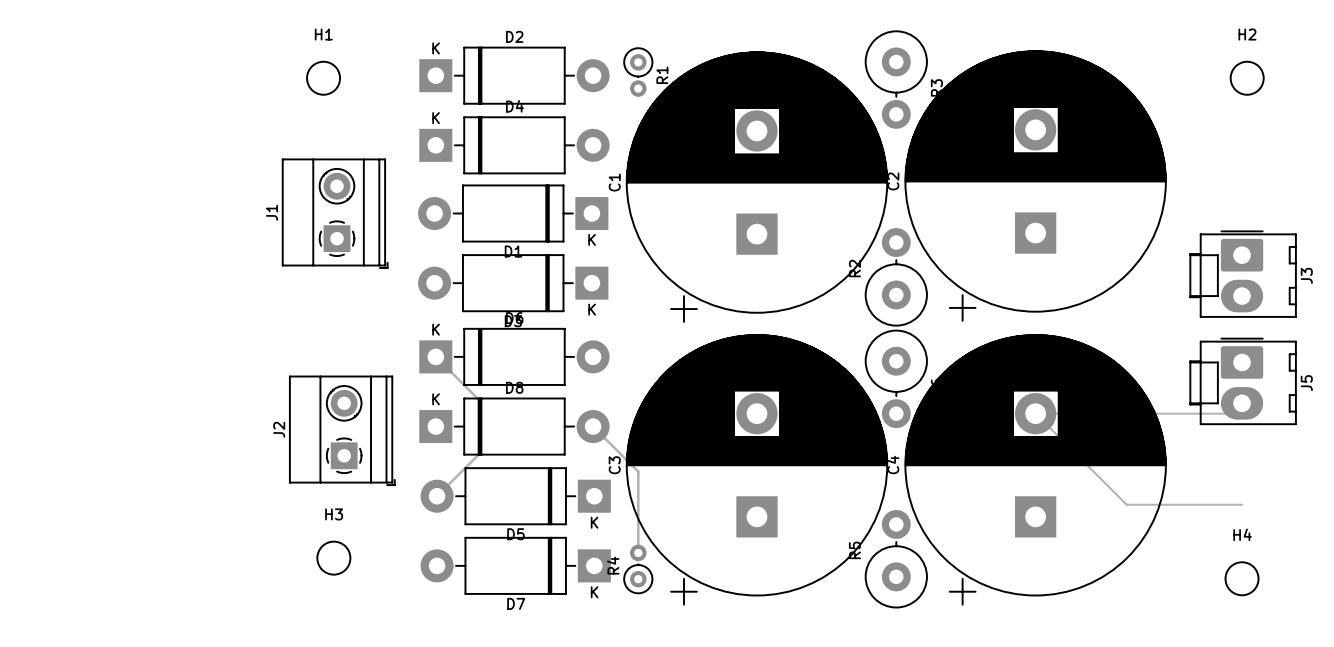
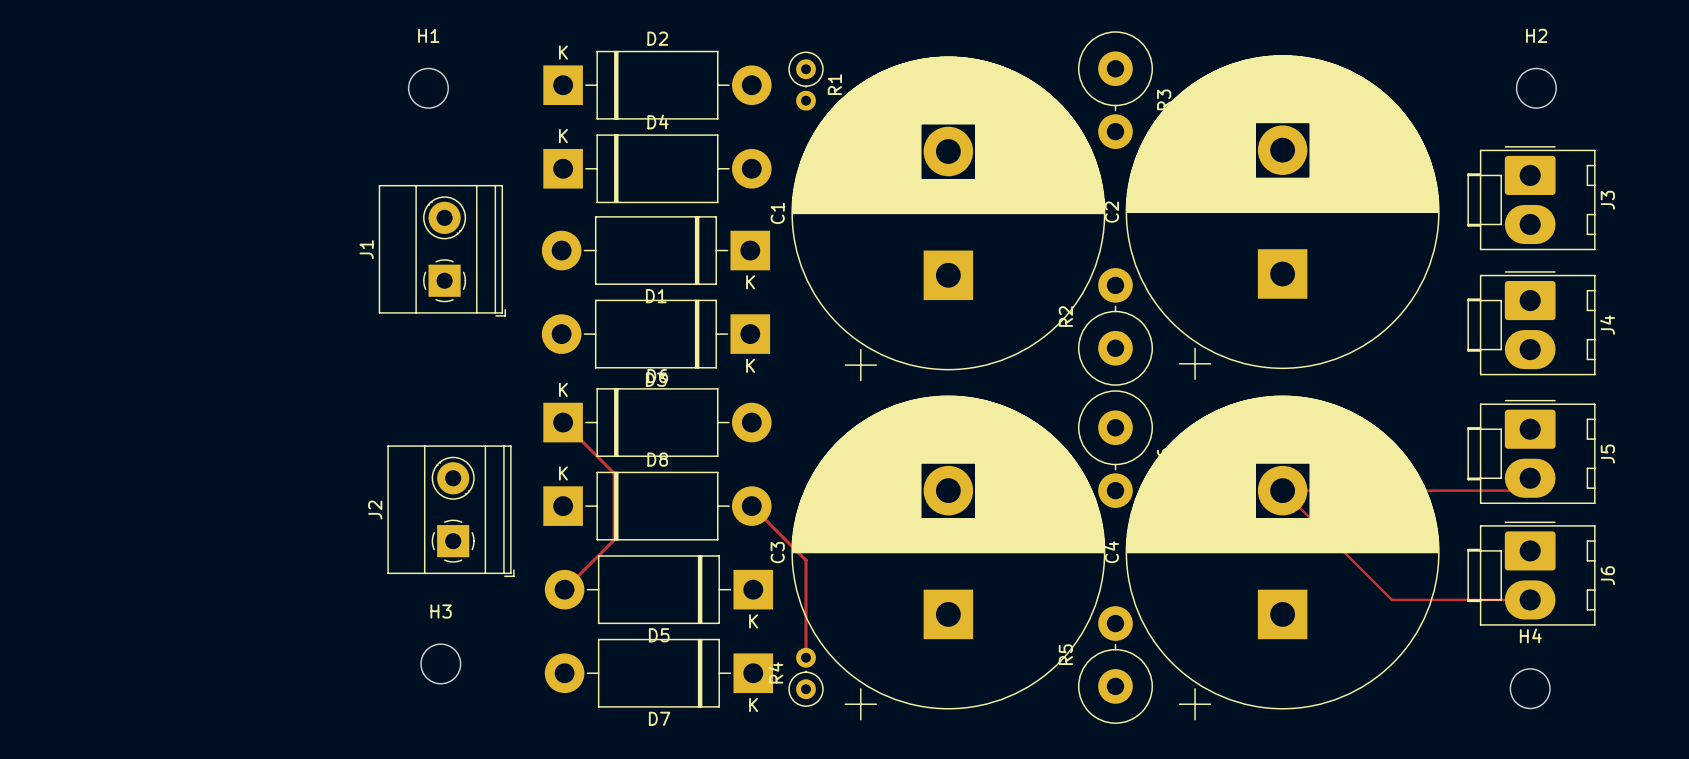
J3: none -> (1531, 198)
J3 name: J3 (1306, 275) -> J4 (1607, 325)
J6: none -> (1531, 573)

